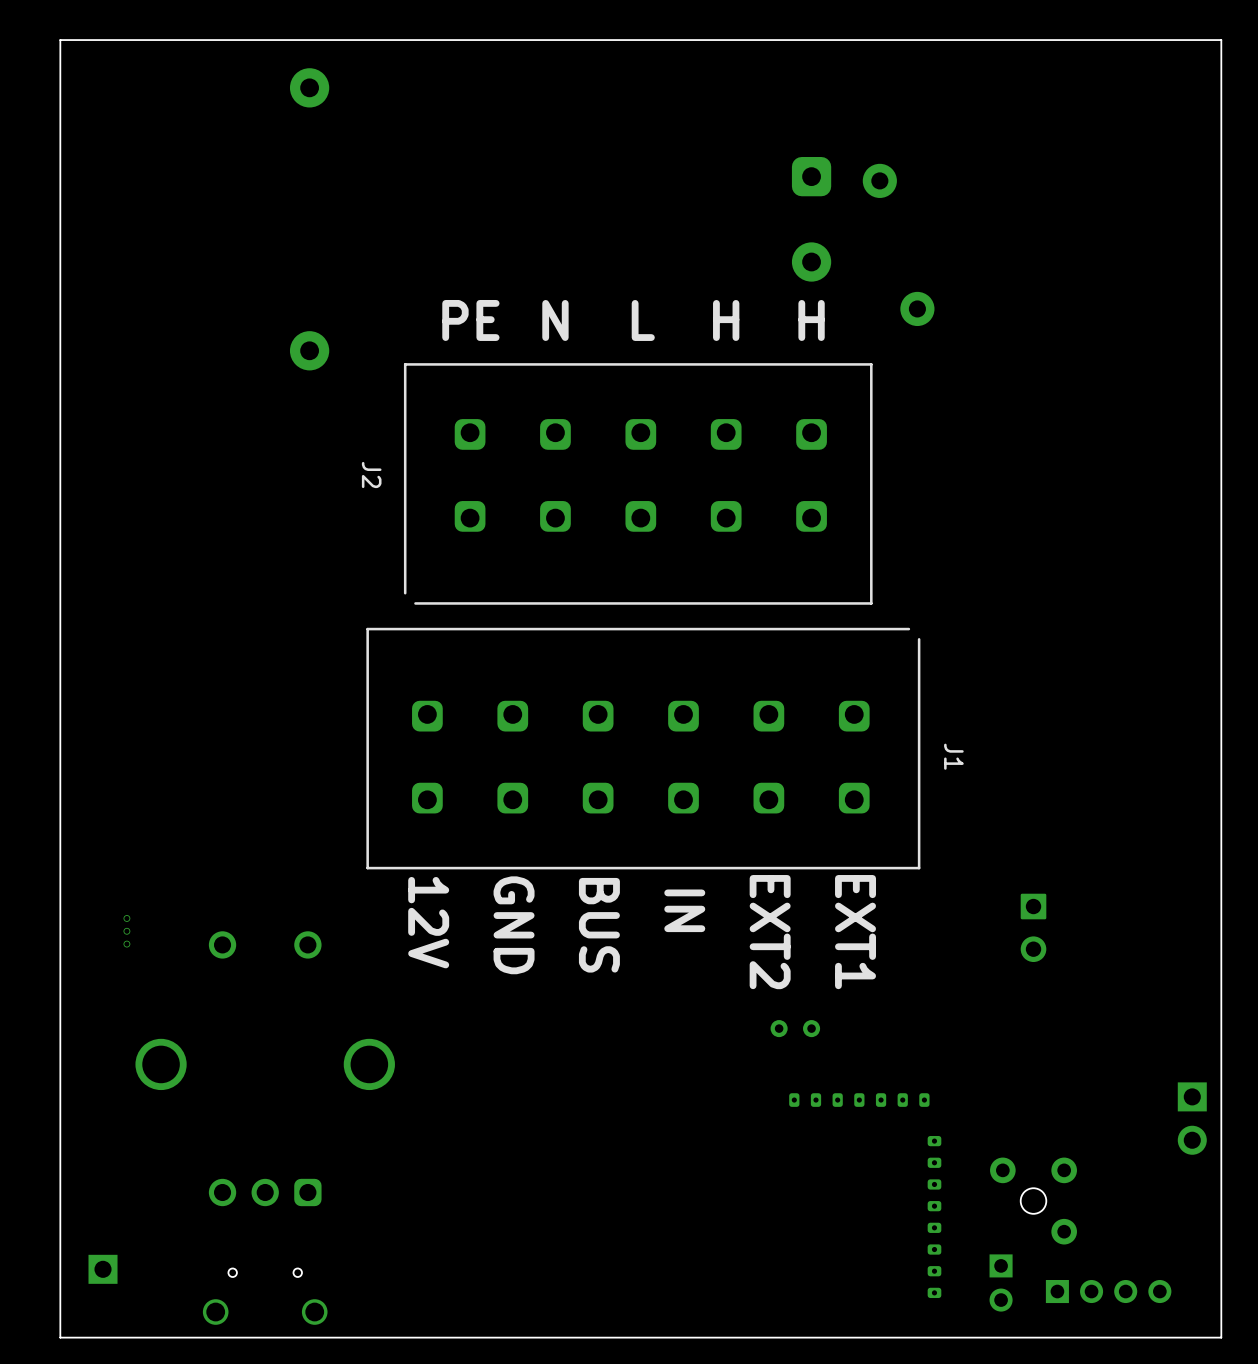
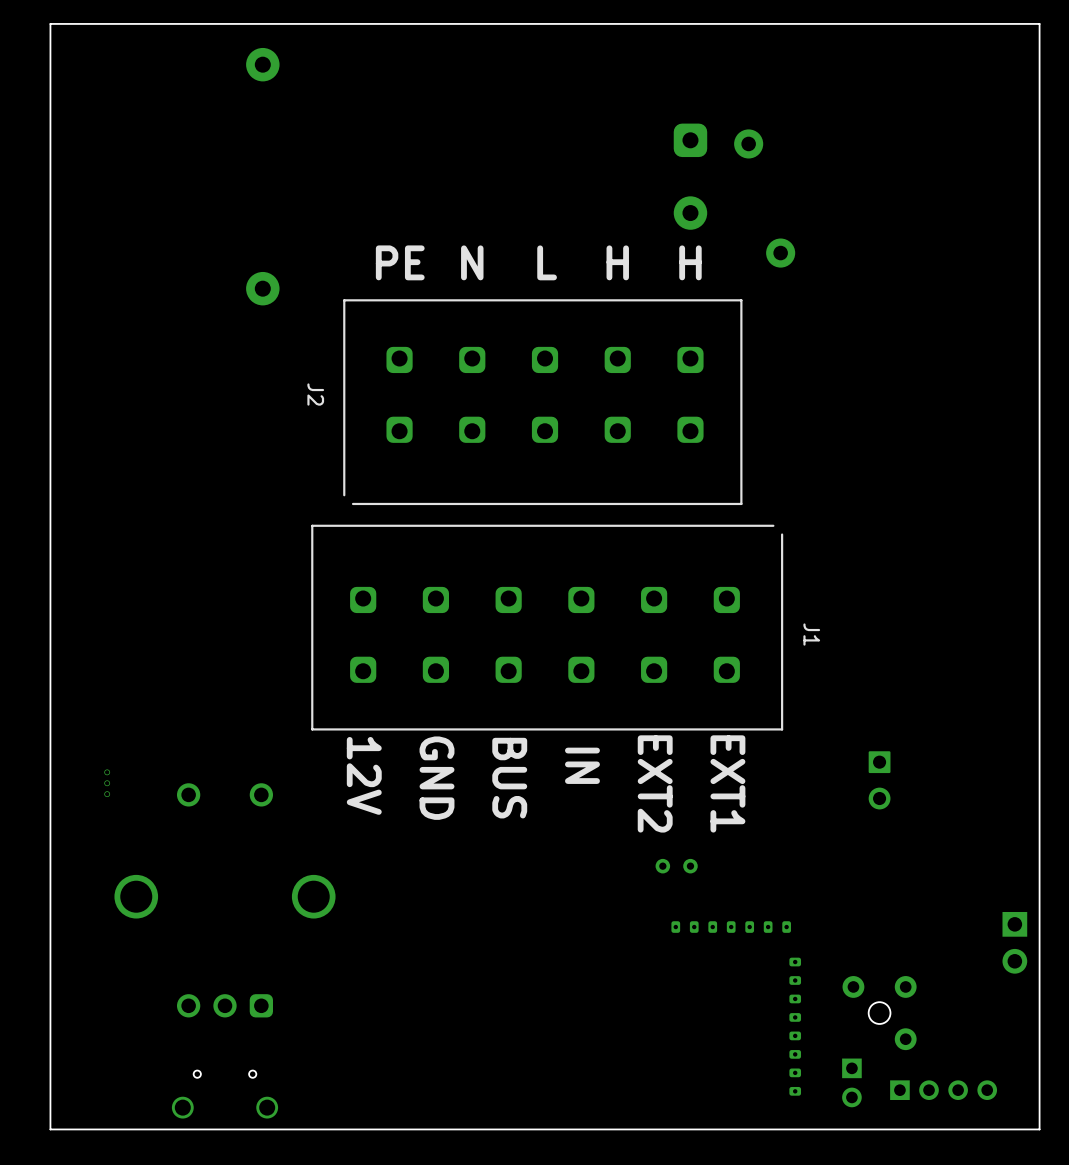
part: (103, 1269) -> none

